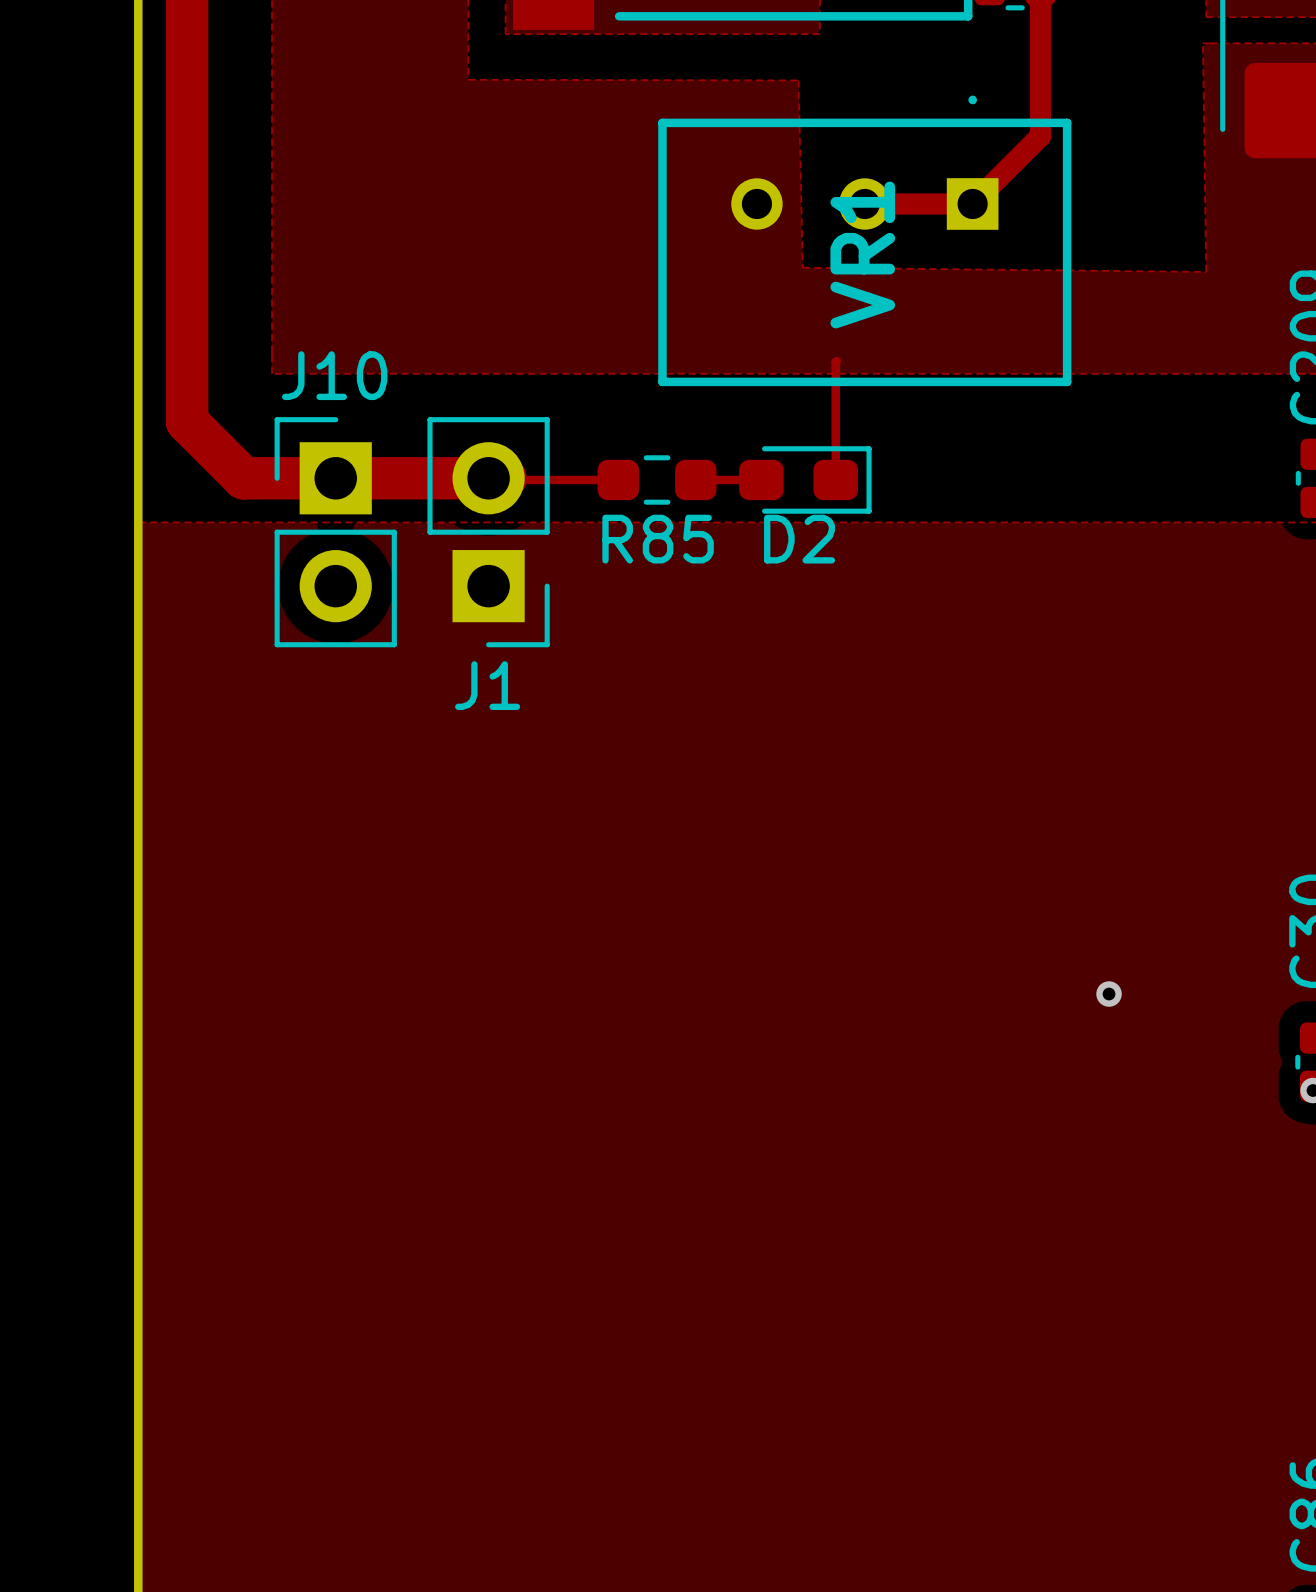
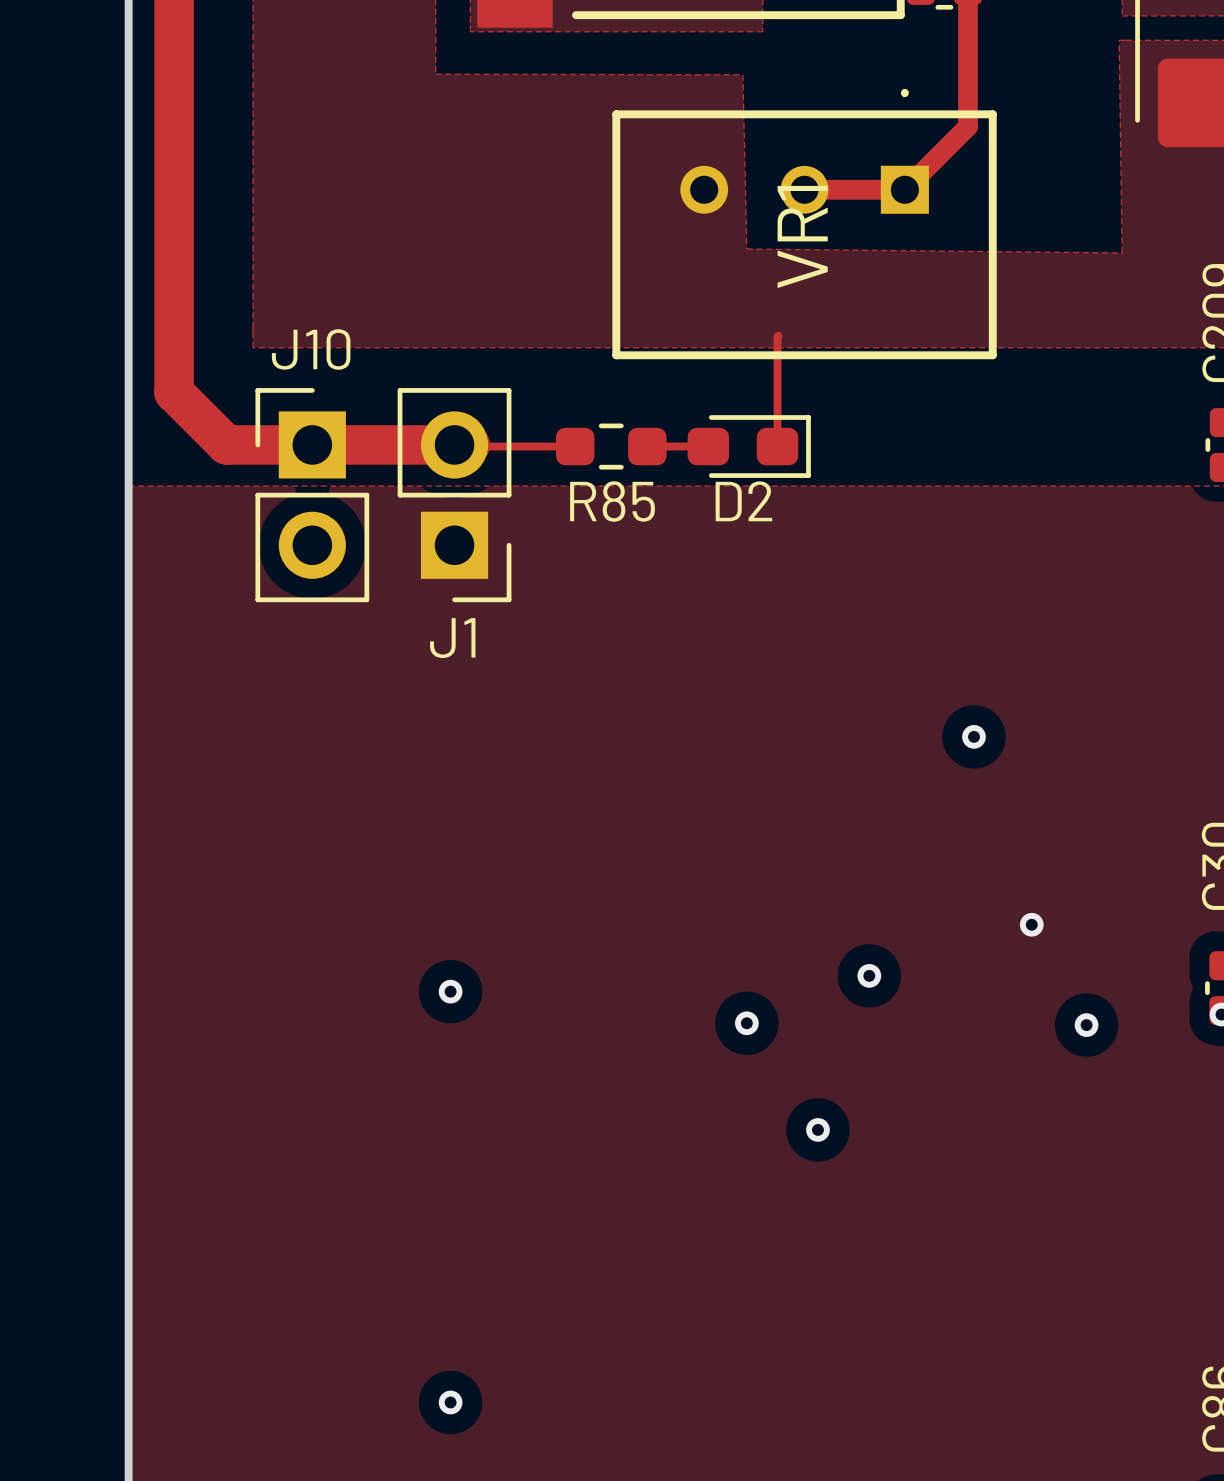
via: none -> (974, 736)
via: none -> (869, 975)
via: none -> (450, 991)
via: none -> (746, 1023)
via: none -> (1086, 1025)
via: none -> (817, 1129)
via: none -> (450, 1402)

